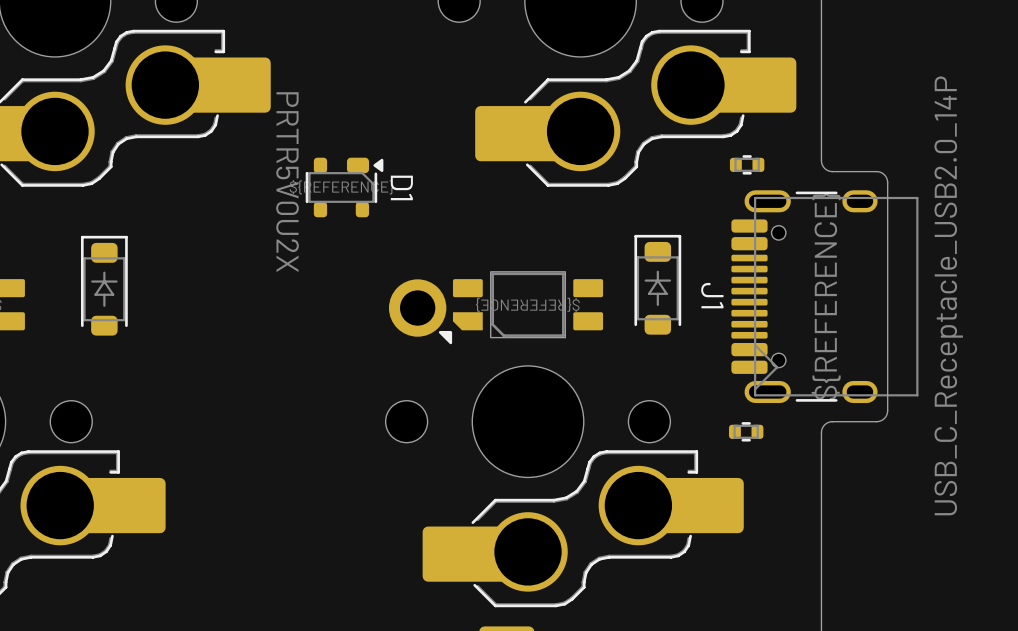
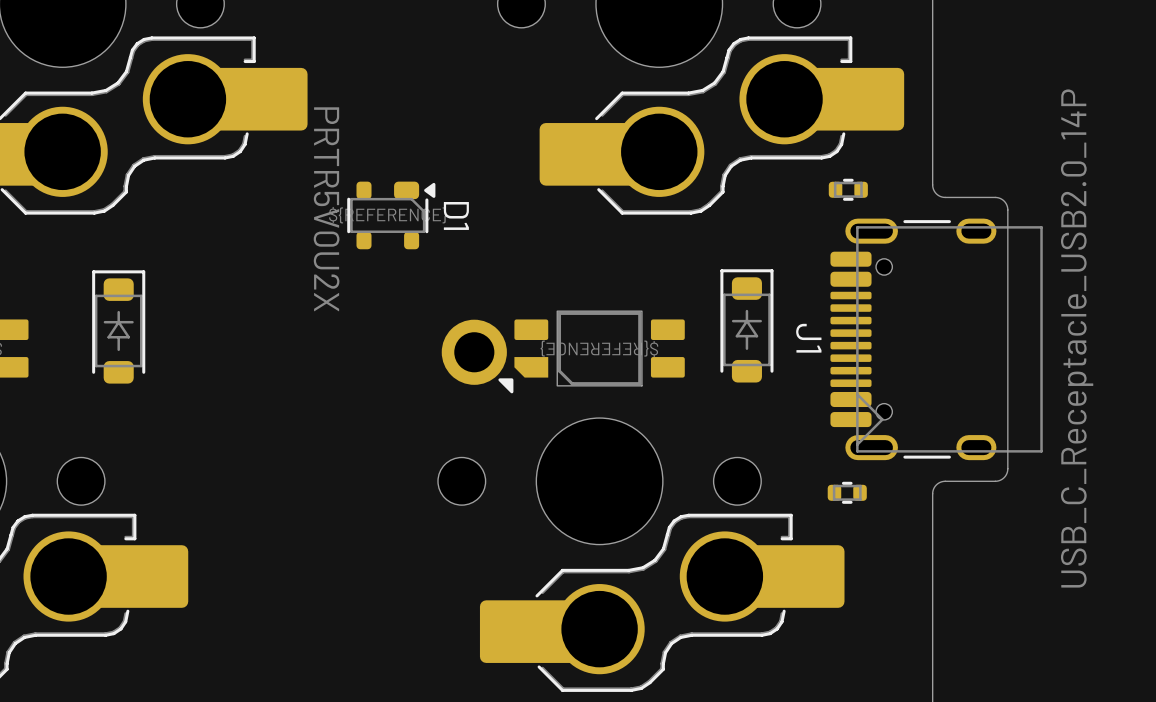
text: ${REFERENCE} (826, 296) -> none

